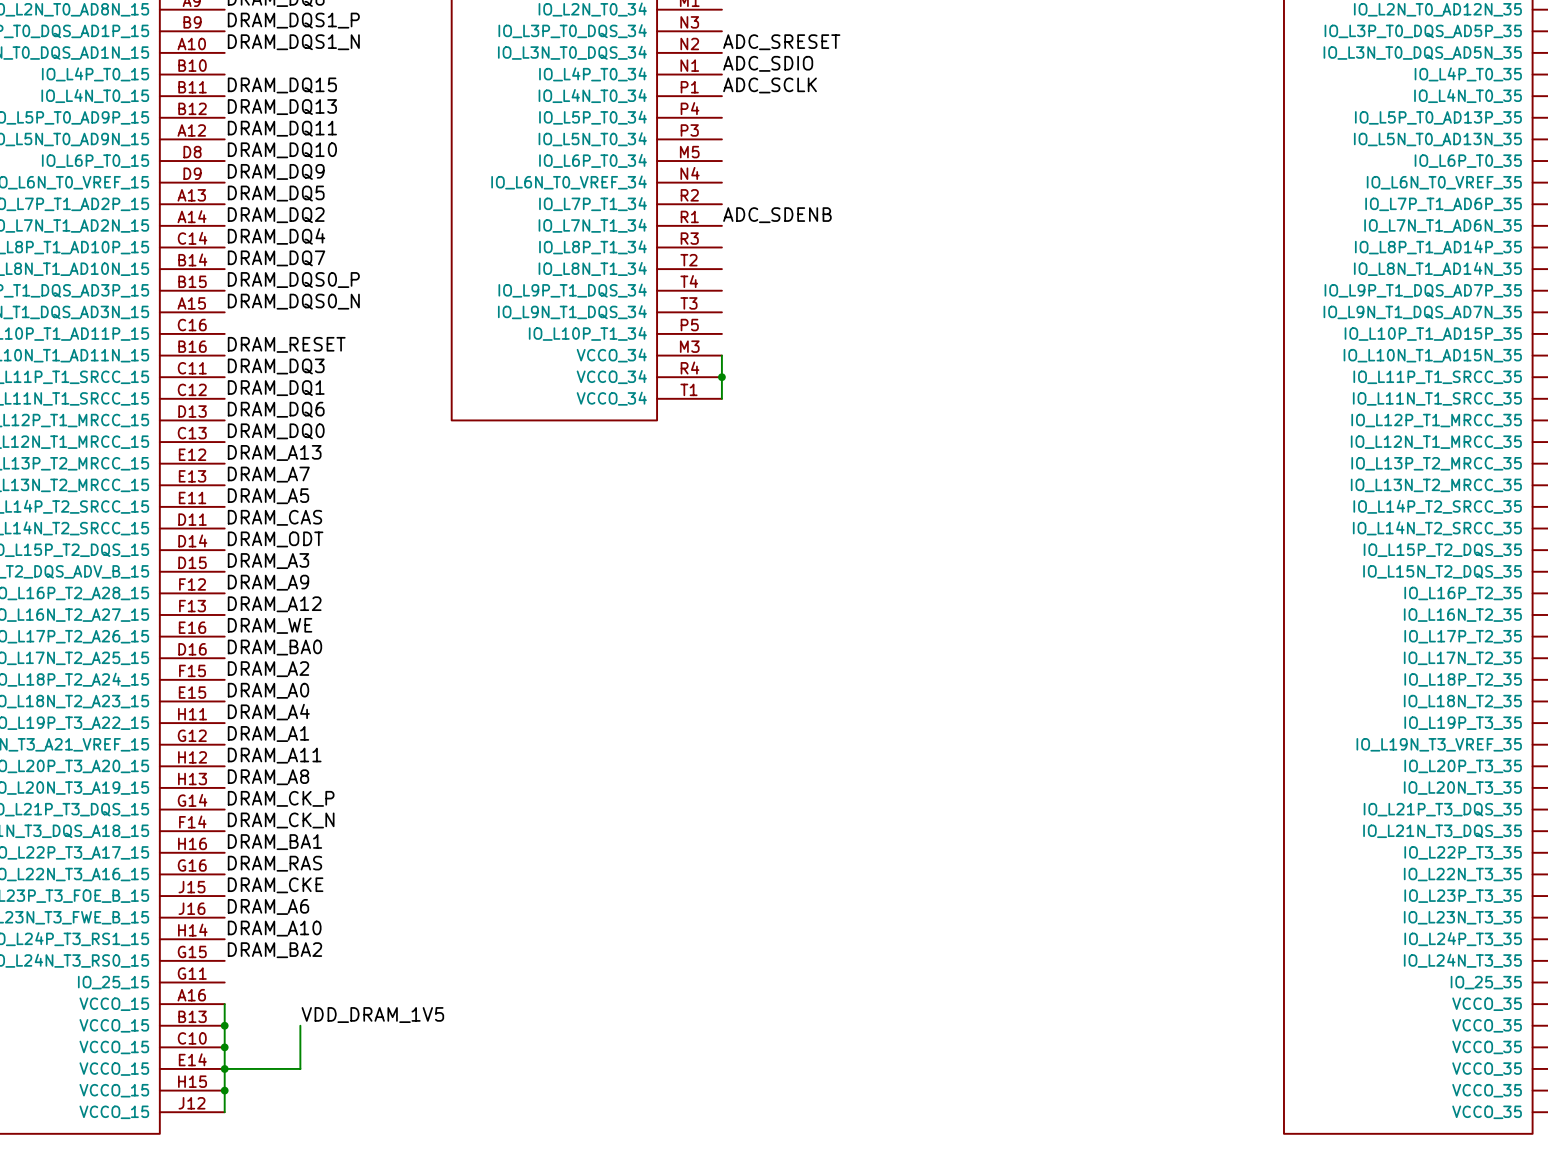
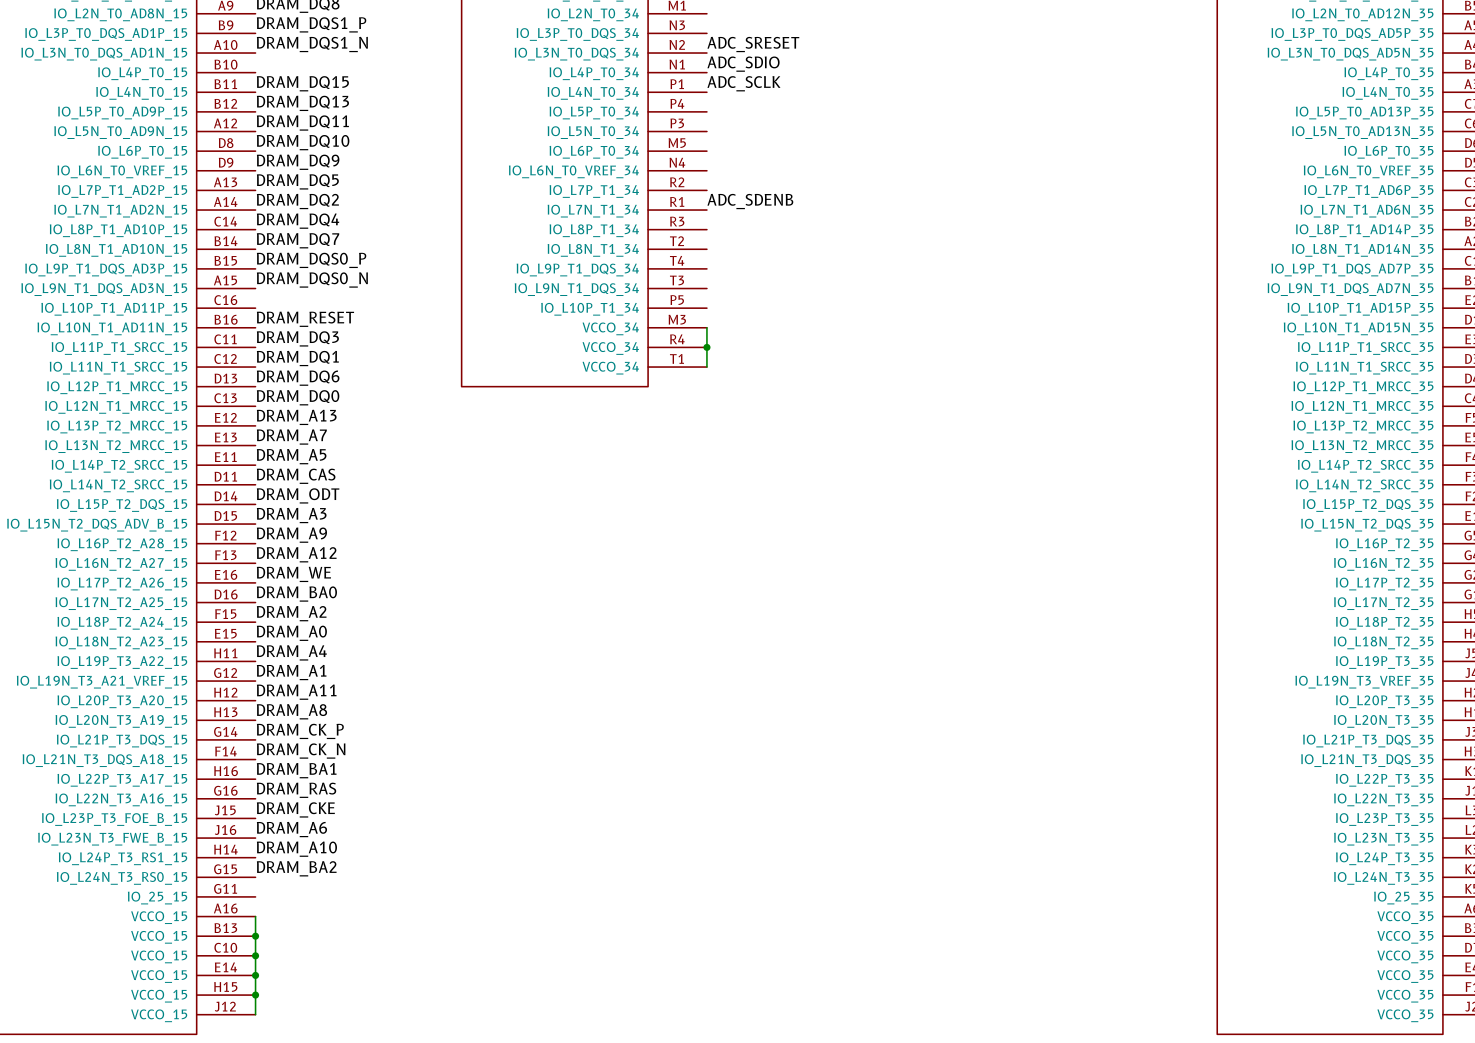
label: VDD_DRAM_1V5 (372, 1015) -> none
wire: (300, 1025) (300, 1068) (224, 1068) -> none

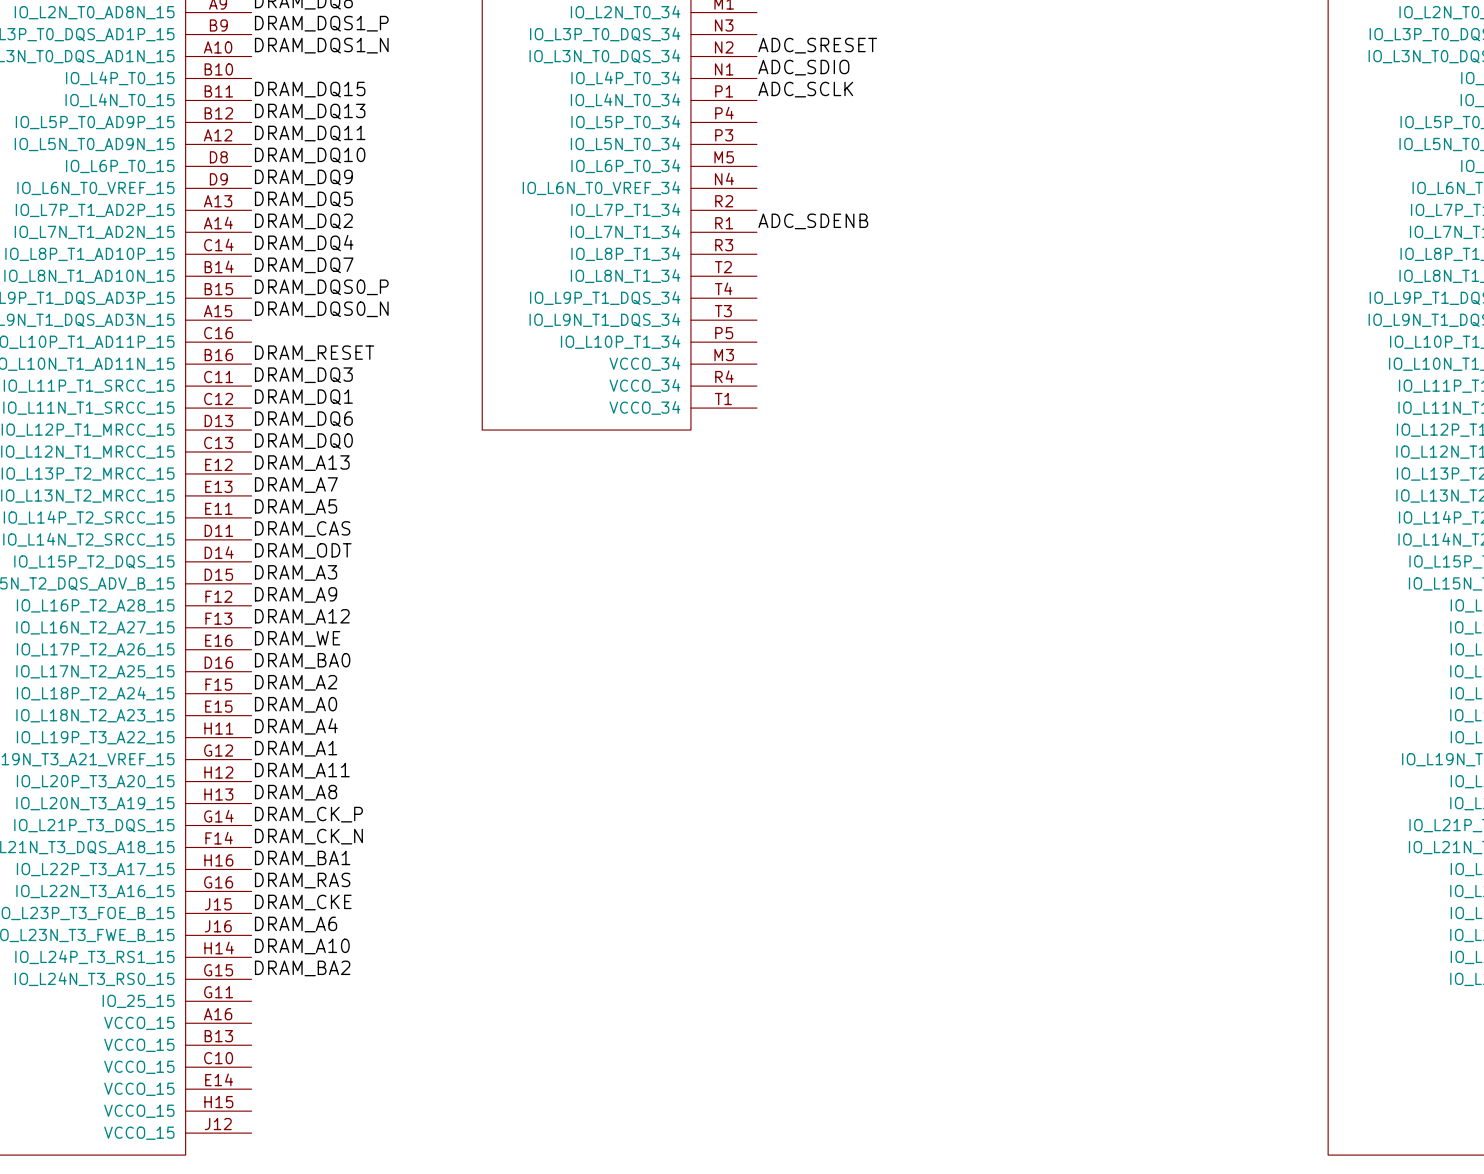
wire: (706, 327) (706, 367) -> none
junction: (706, 347) -> none
wire: (255, 916) (255, 1014) -> none
junction: (255, 936) -> none
junction: (255, 955) -> none
junction: (255, 975) -> none
junction: (255, 995) -> none

